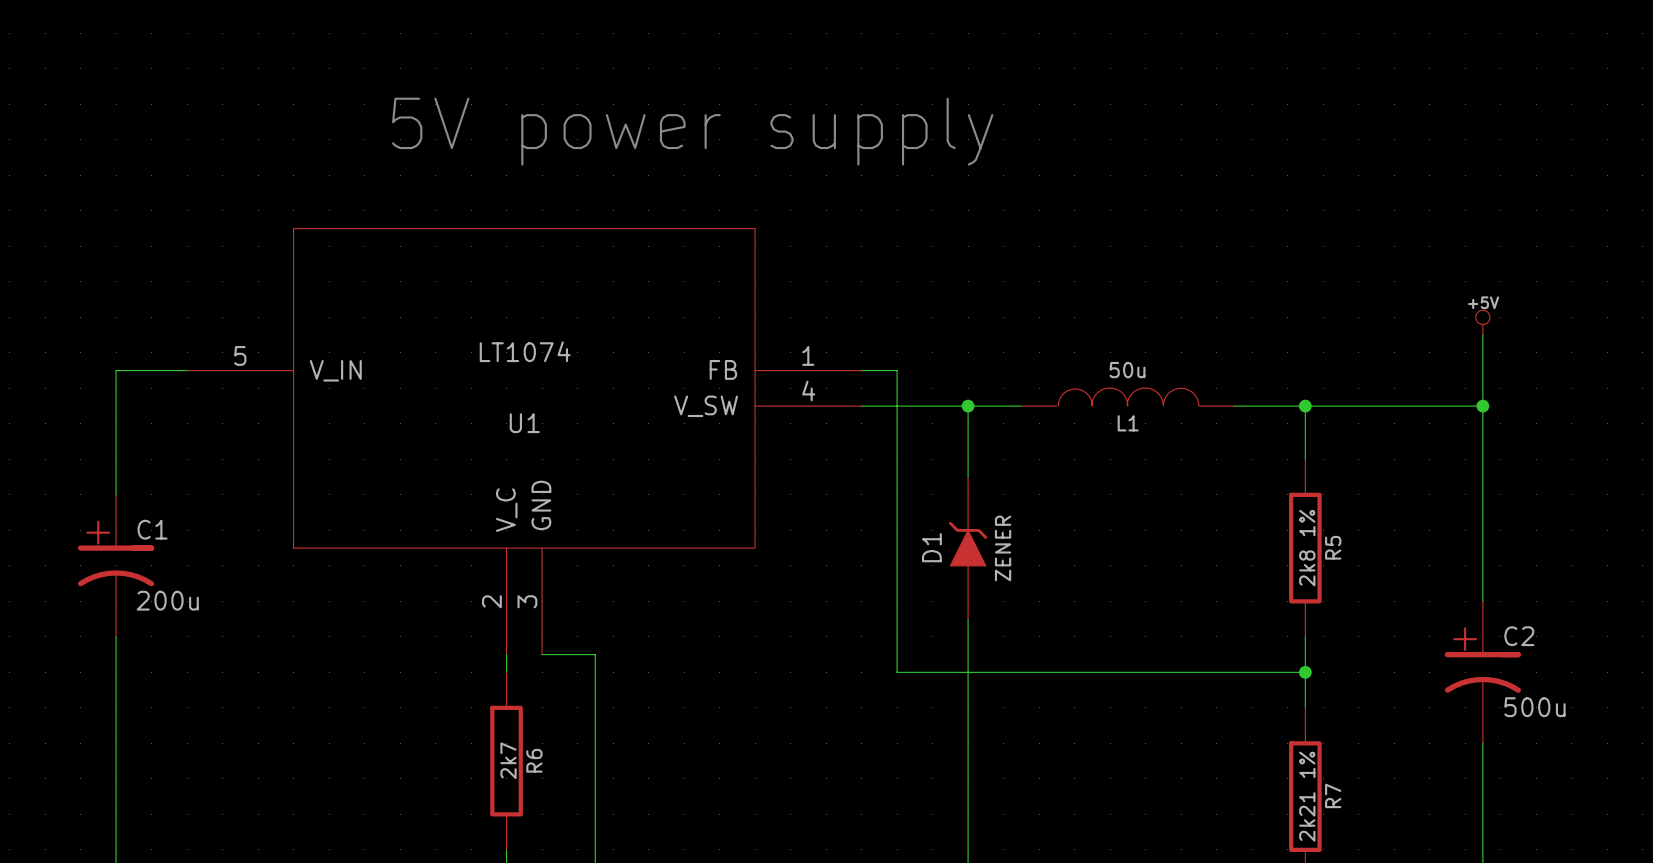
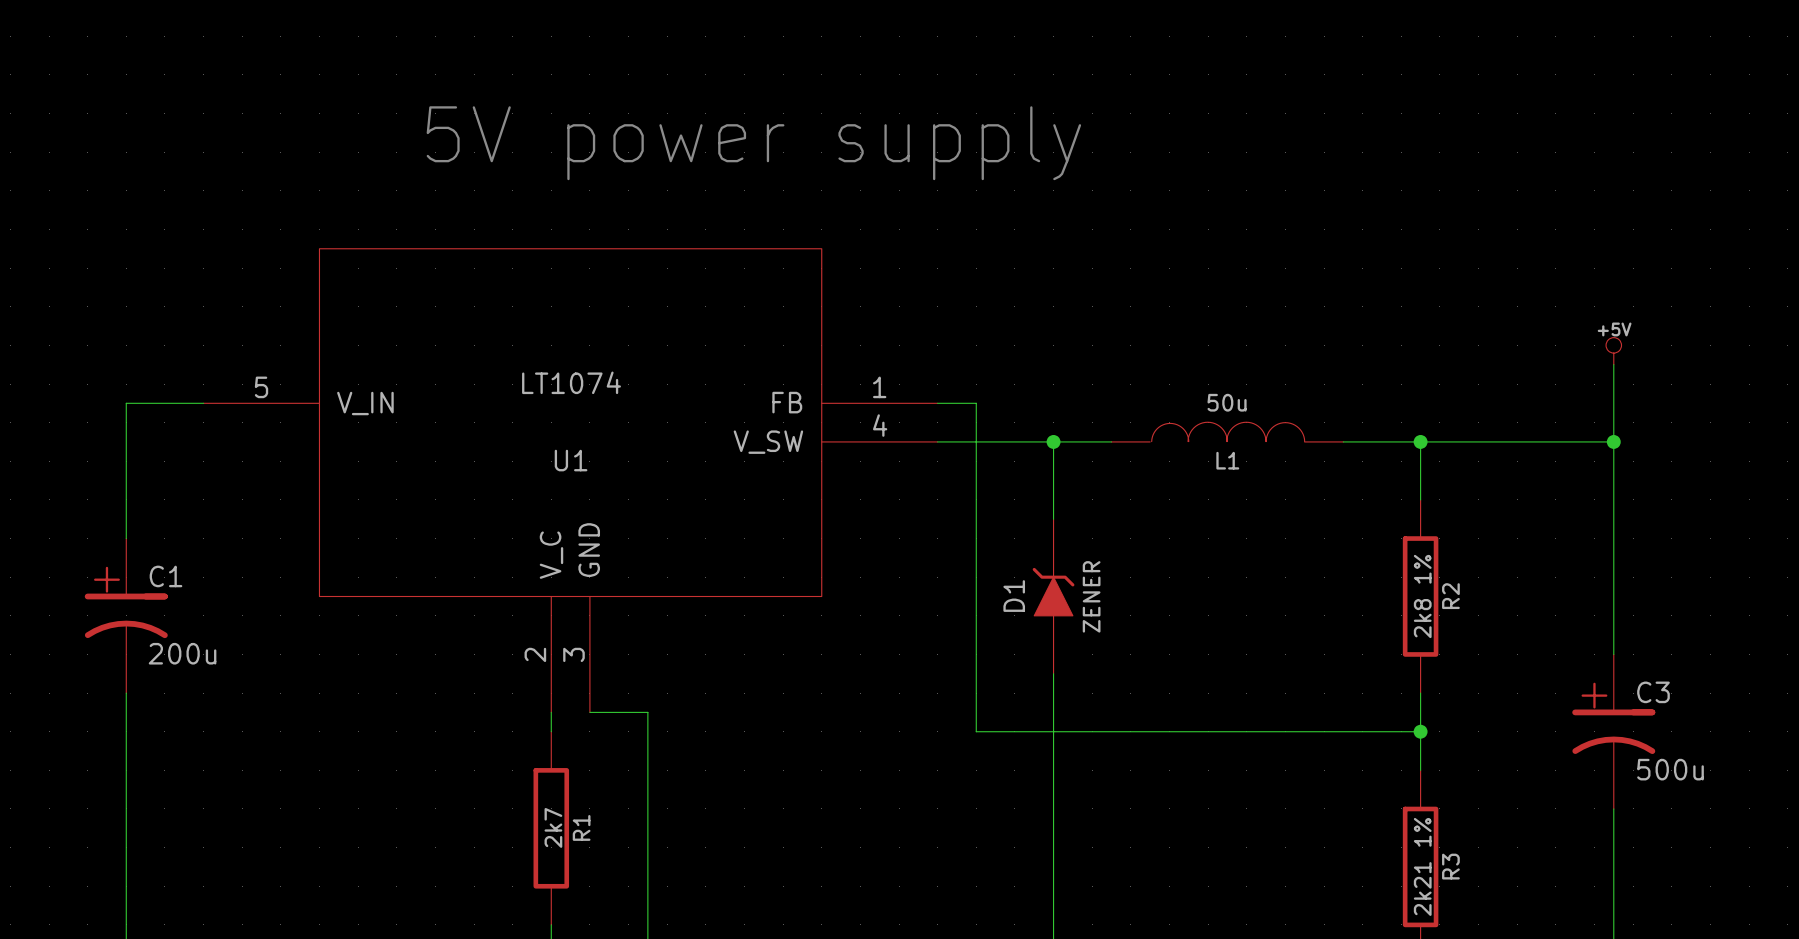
R5 name: R5 (1333, 547) -> R2 (1450, 596)
C2 name: C2 (1519, 636) -> C3 (1653, 692)
R6 name: R6 (534, 760) -> R1 (581, 827)
R7 name: R7 (1333, 795) -> R3 (1450, 866)

